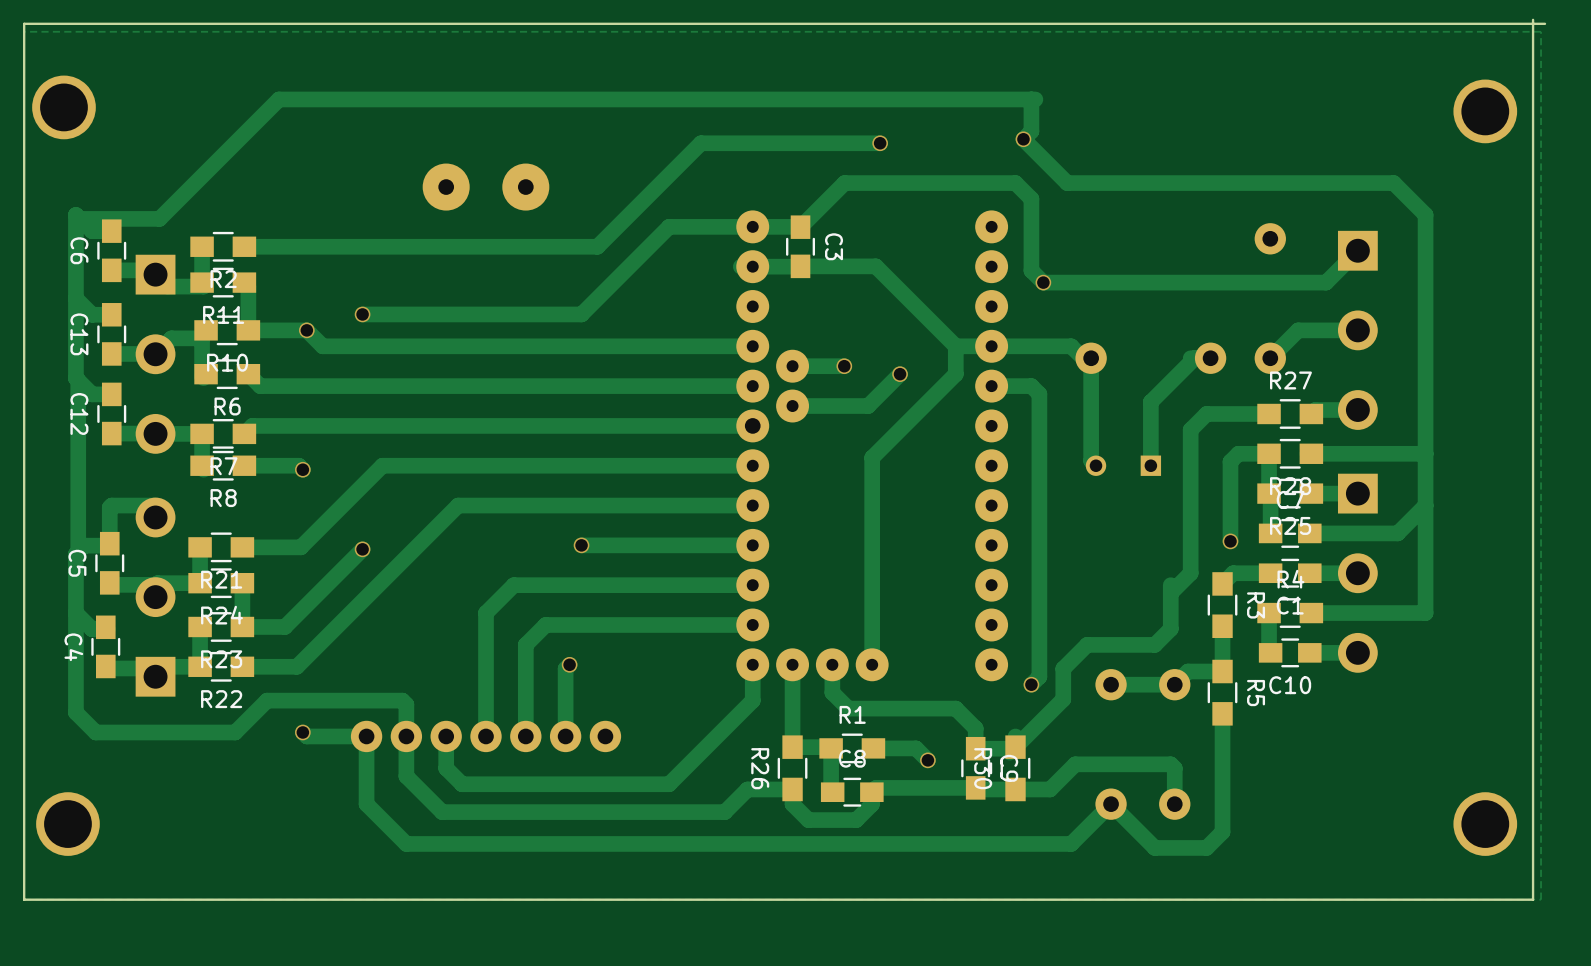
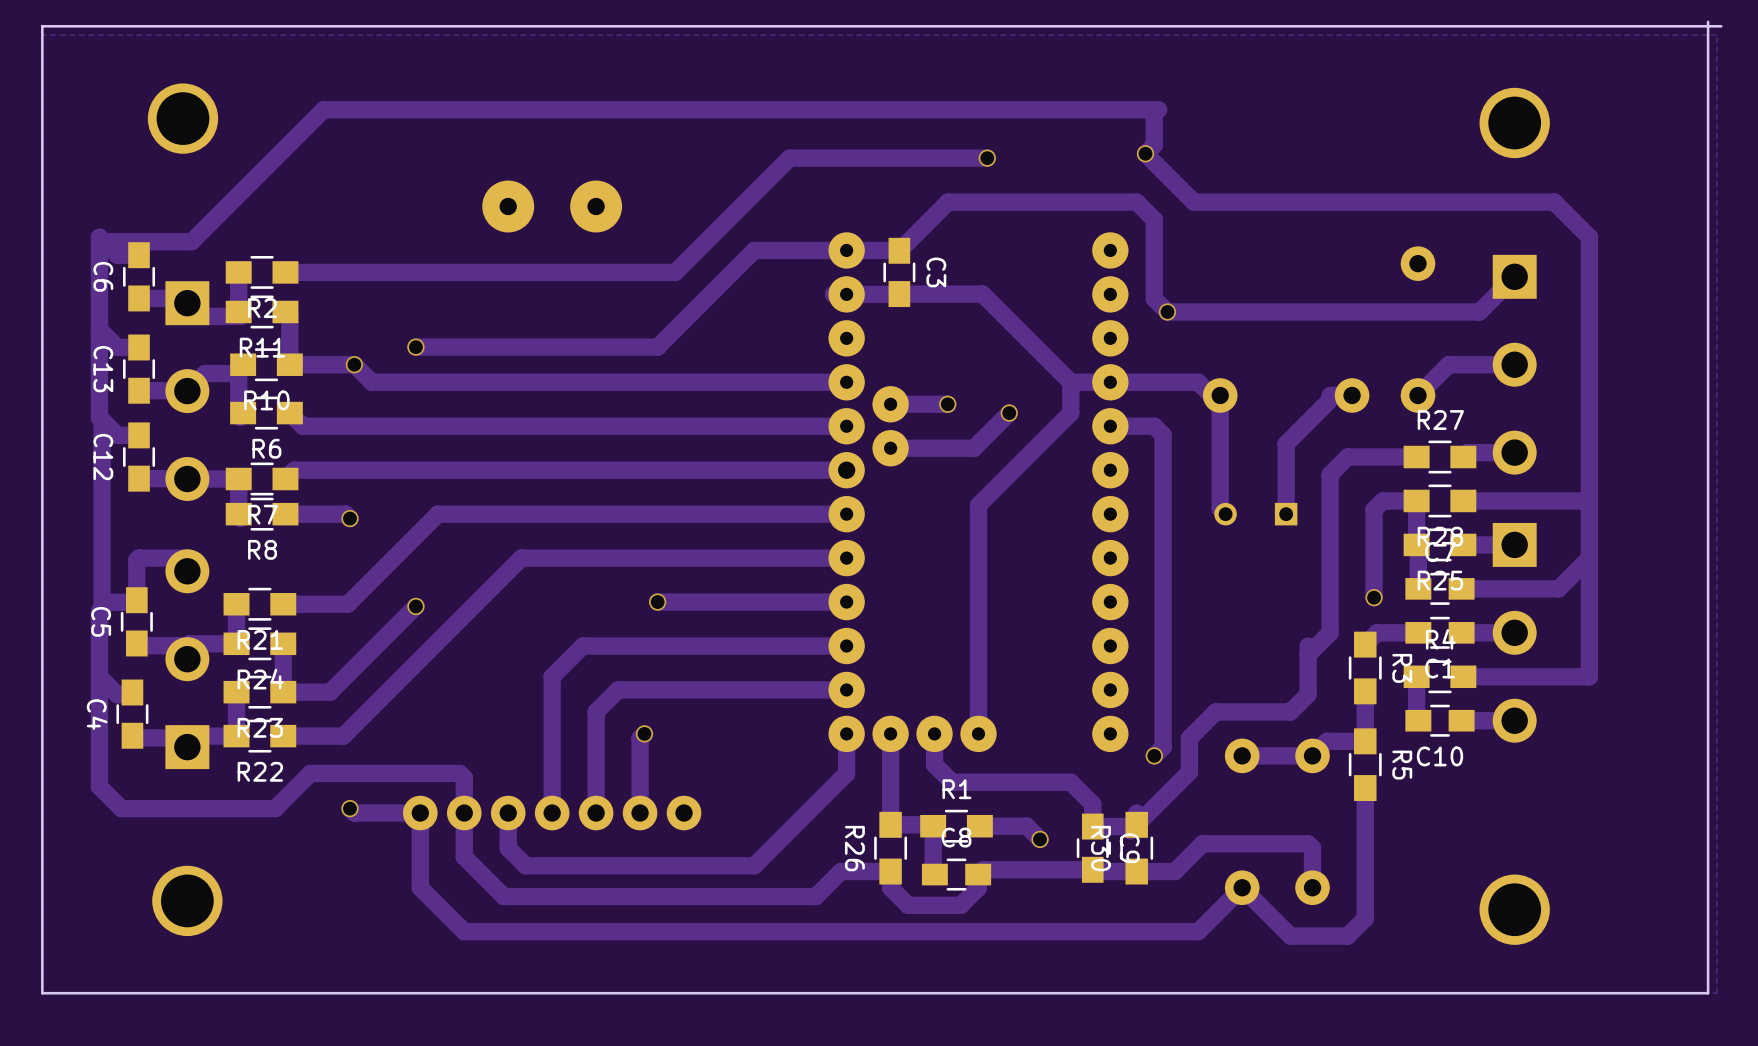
part position: (63, 107) -> (182, 118)
part position: (1485, 111) -> (1514, 122)
part position: (67, 824) -> (187, 900)
part position: (1485, 824) -> (1514, 909)

